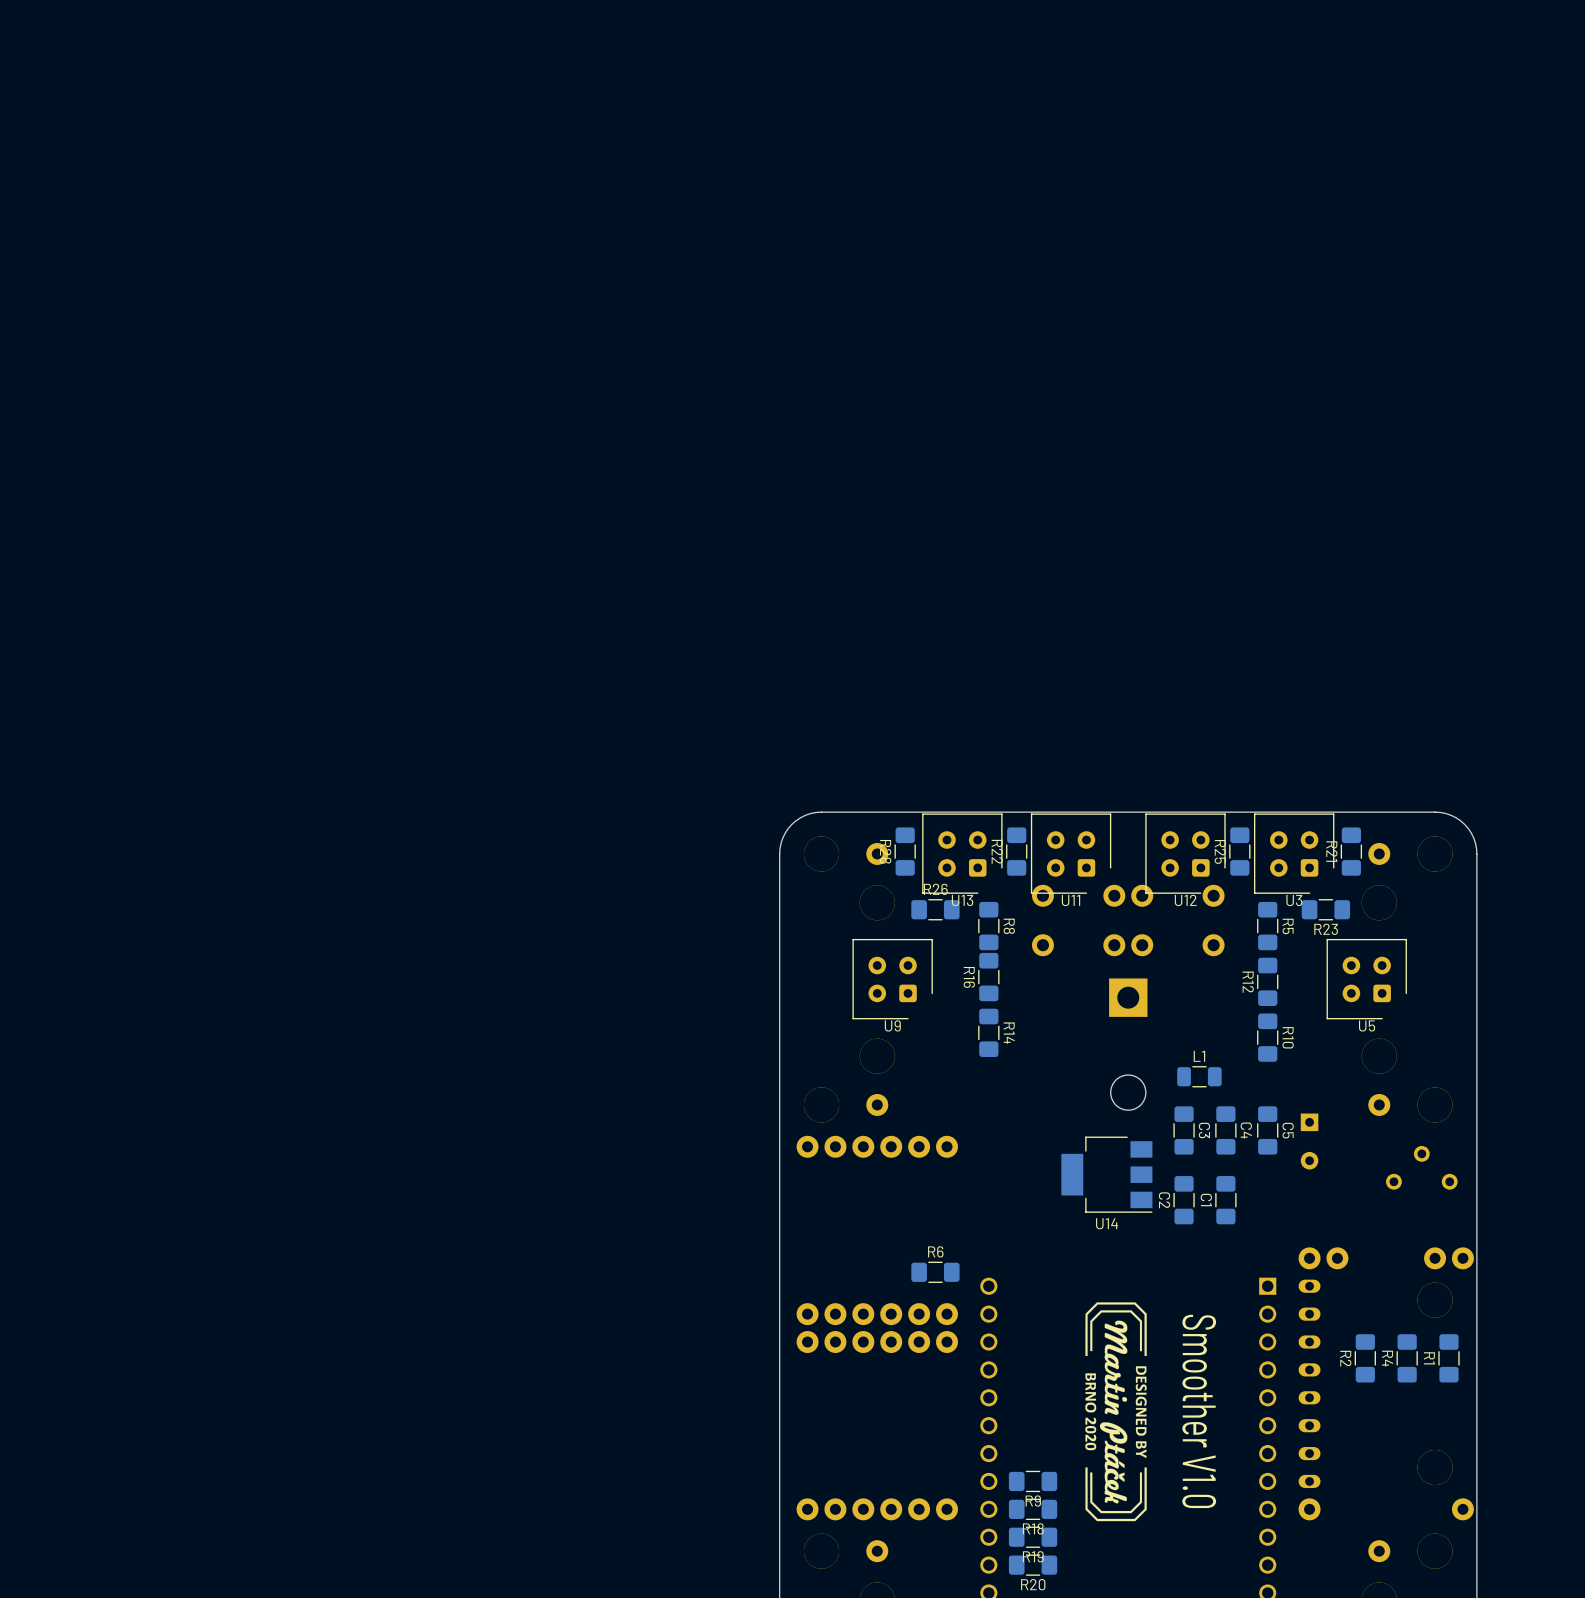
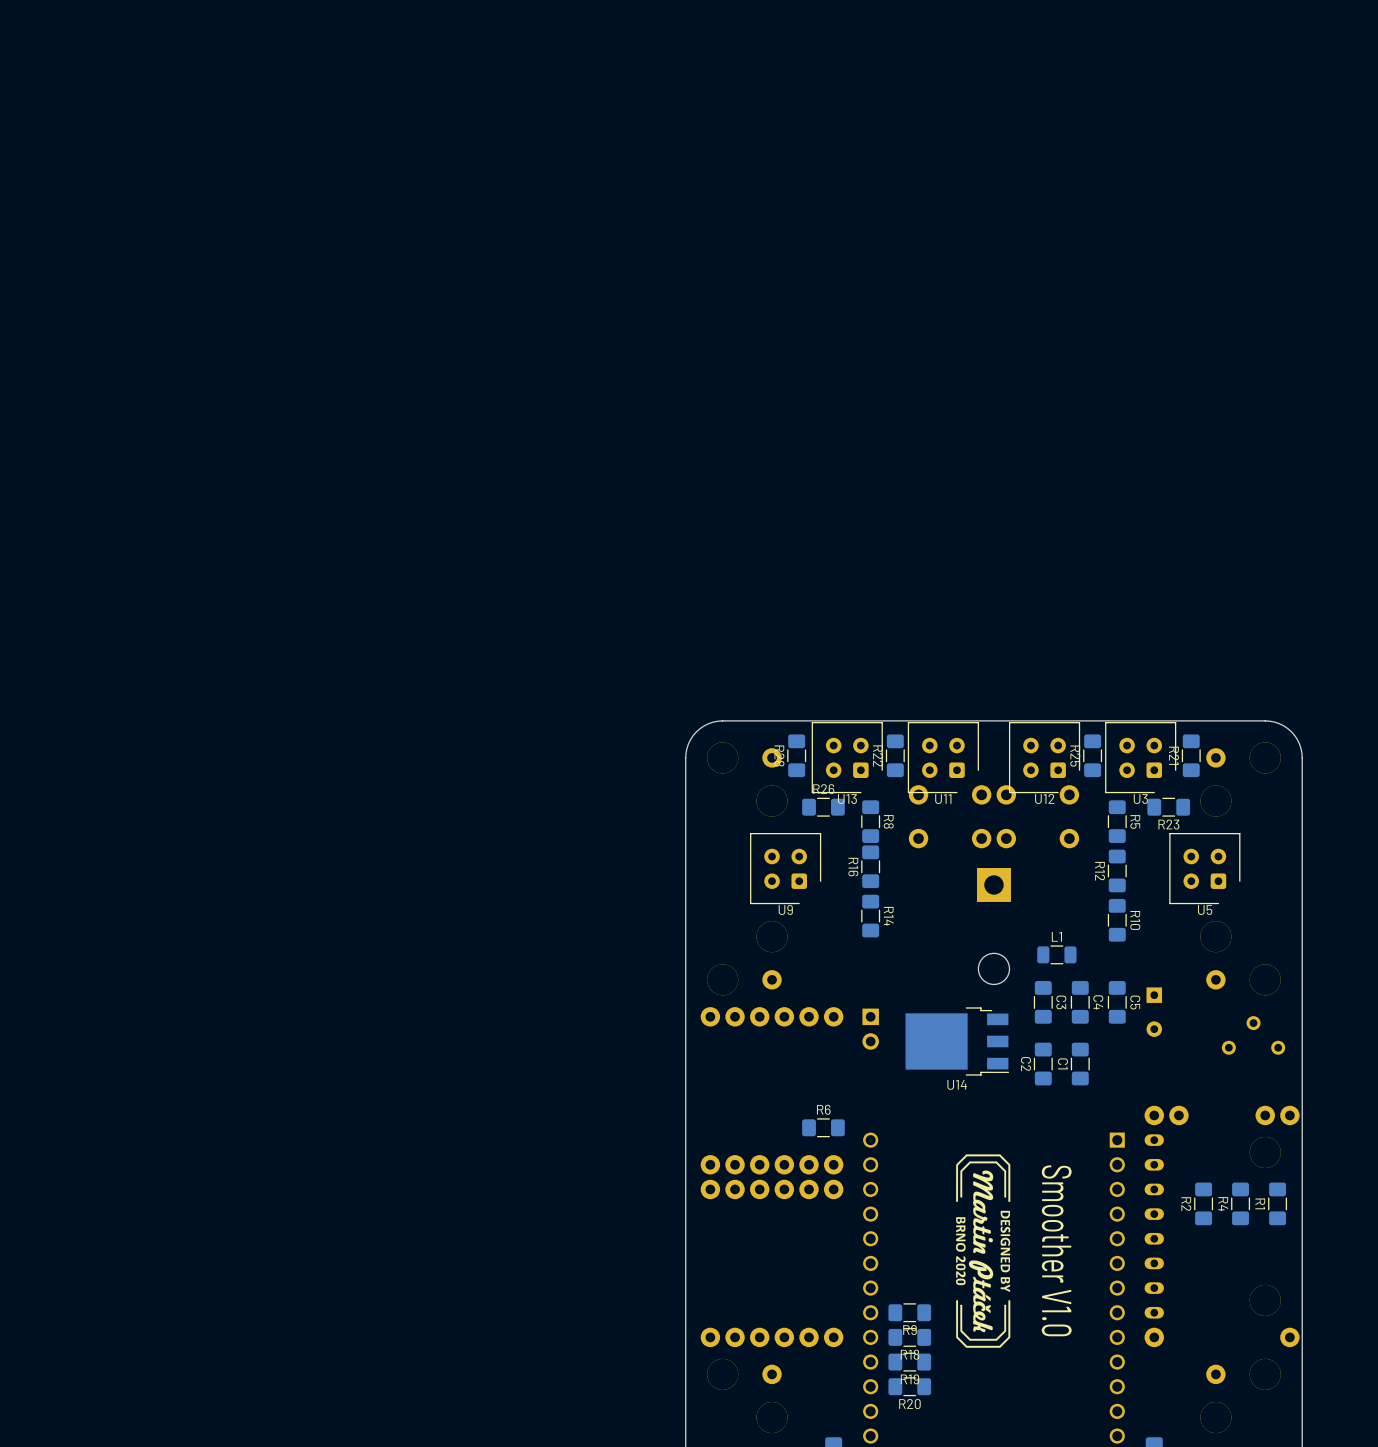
U14 footprint: [1061, 1136, 1153, 1213] -> [905, 1007, 1010, 1076]
part: none -> (870, 1029)

